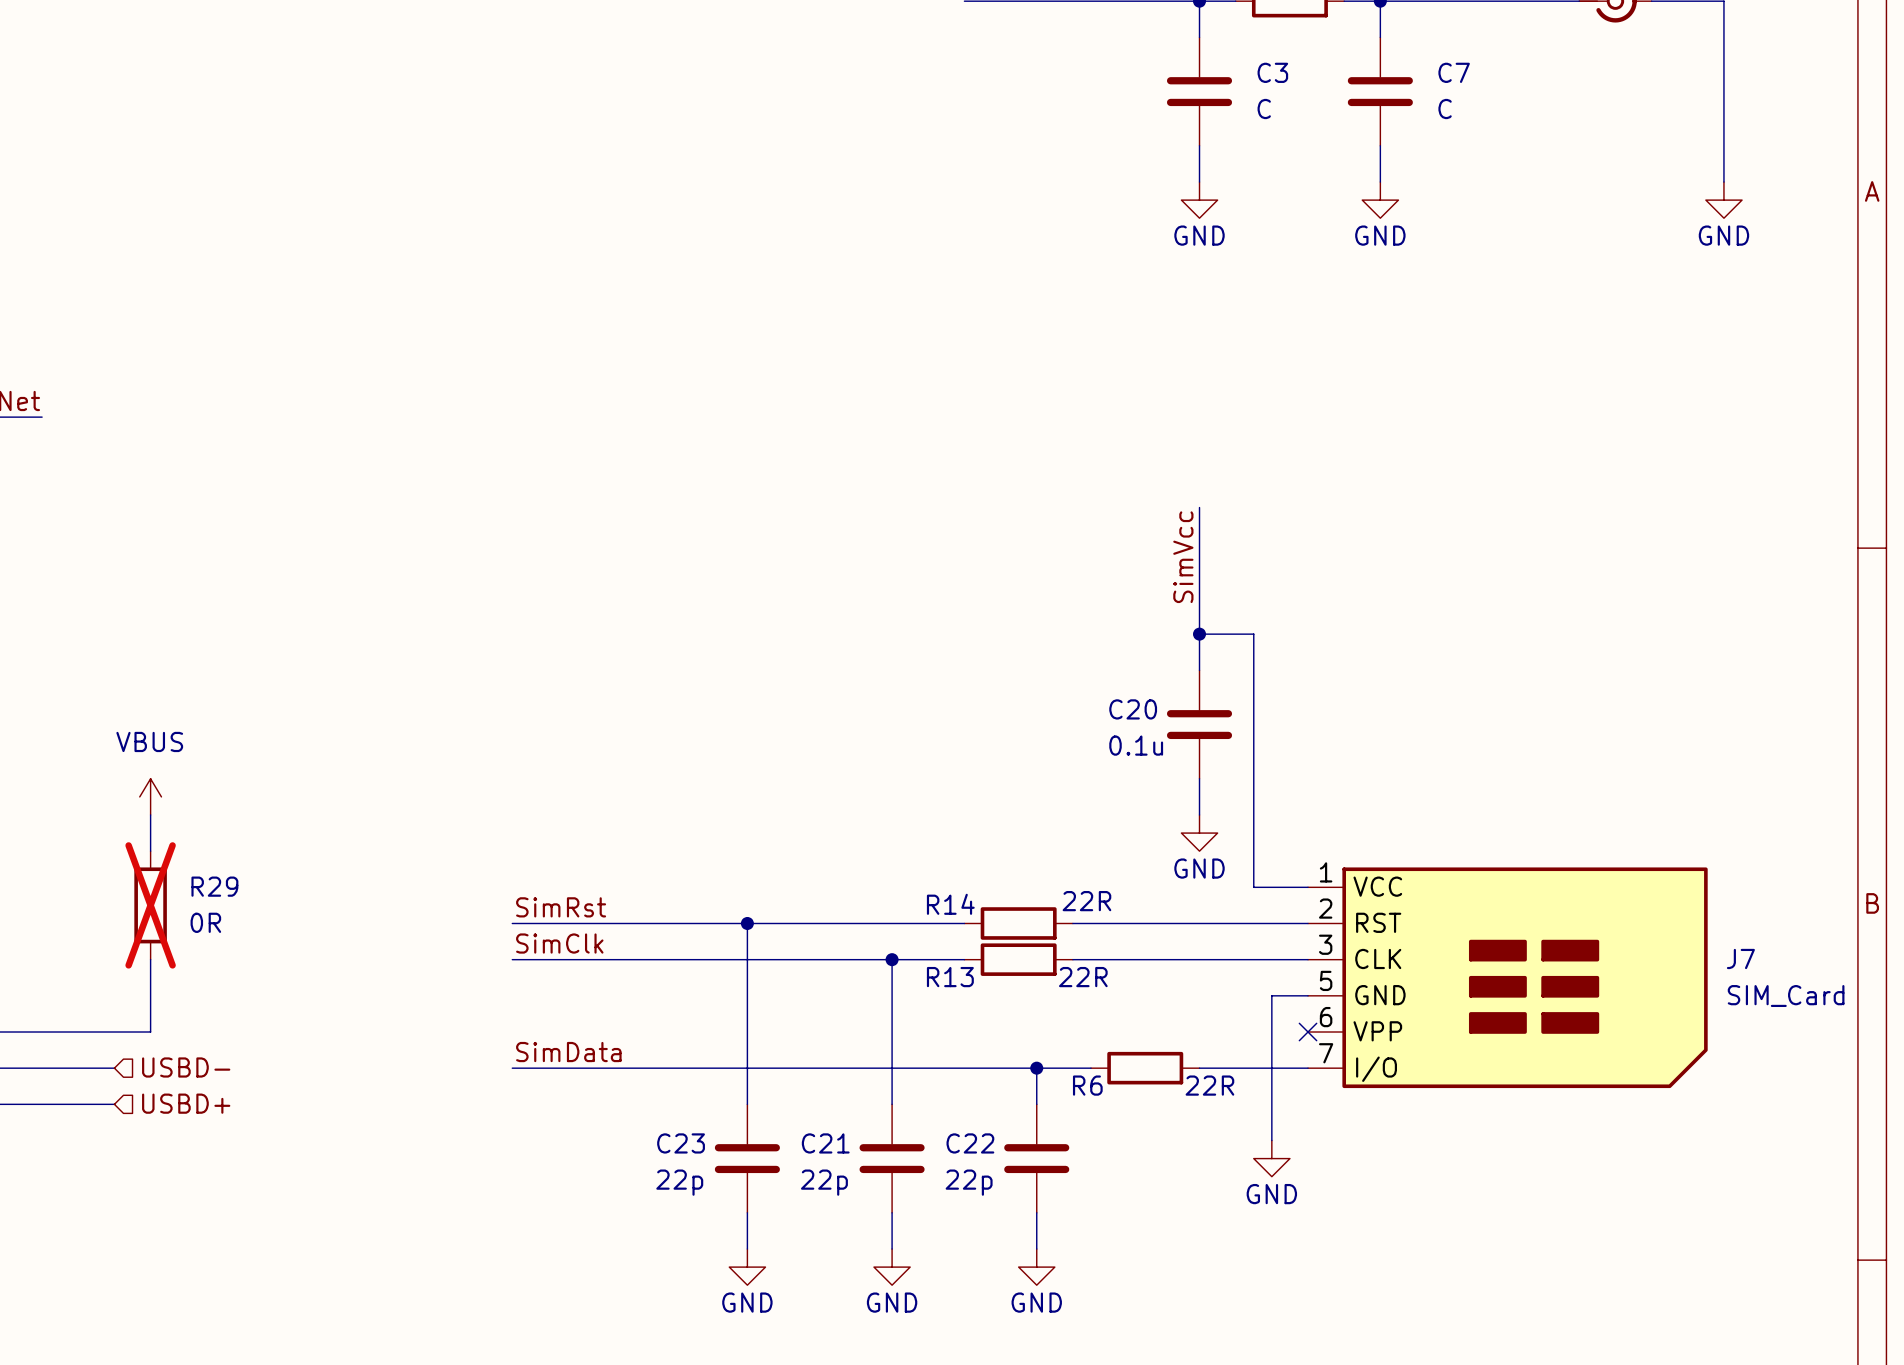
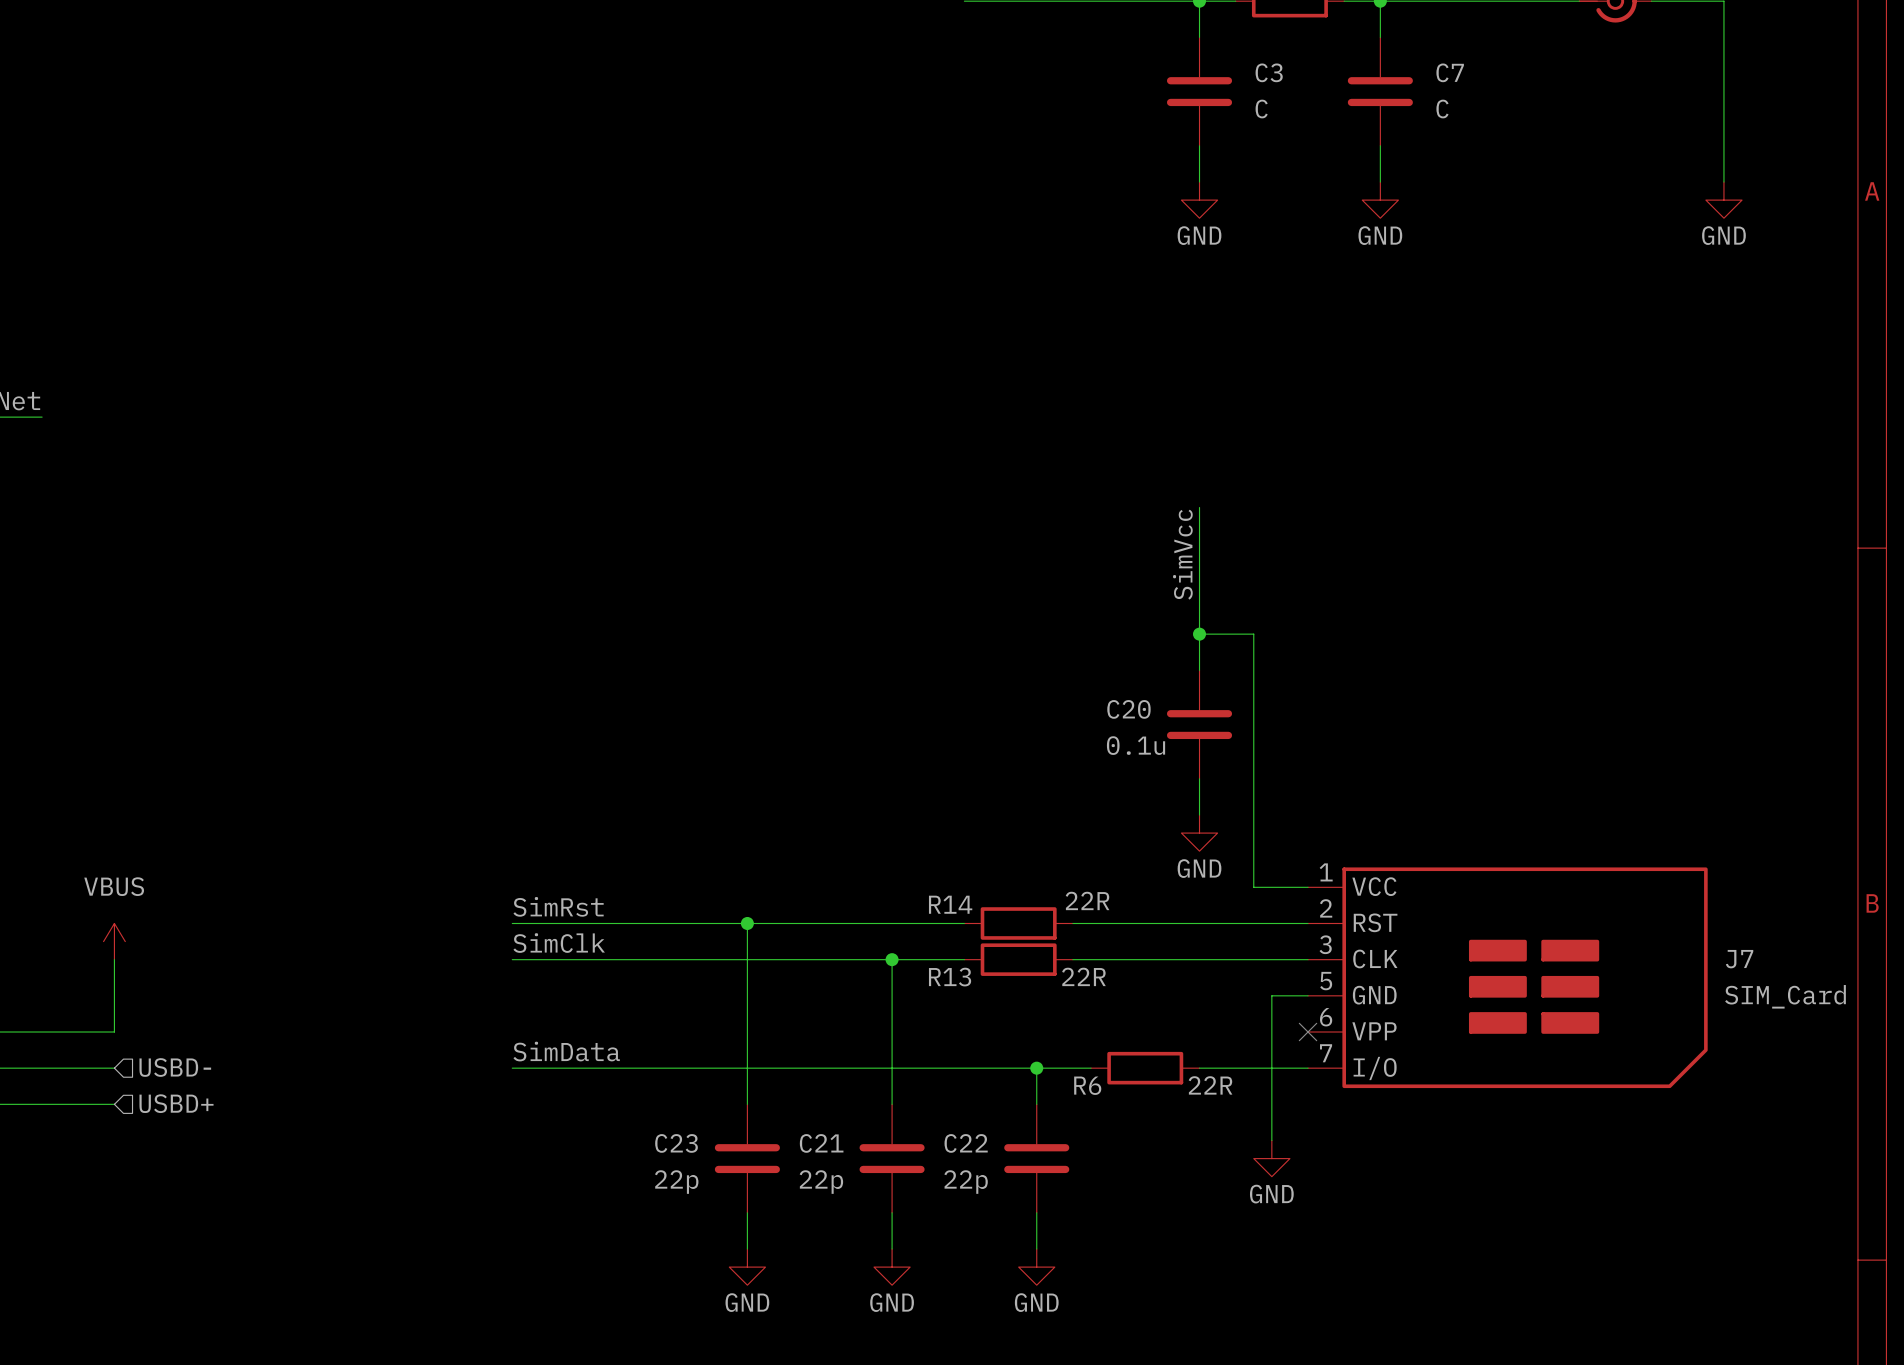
power symbol position: VBUS (150, 796) -> VBUS (114, 941)
wire: (150, 814) (150, 851) -> none
R29: 0R (150, 905) -> none
wire: (150, 959) (150, 1032) (114, 1032) -> (114, 959) (114, 1032)

